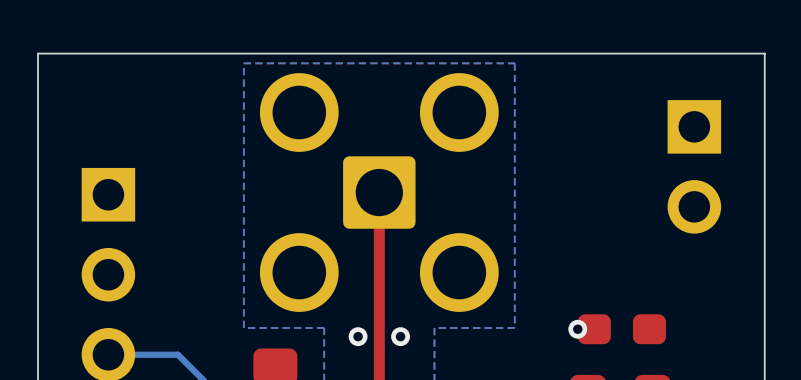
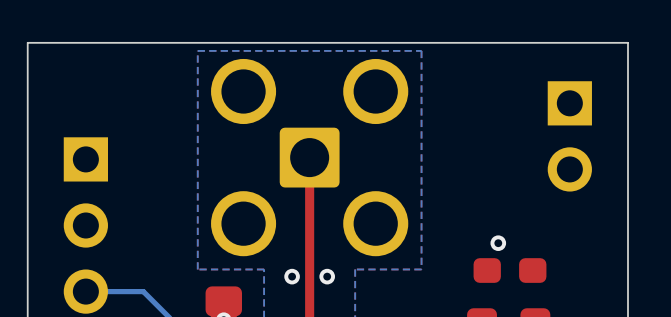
via position: (577, 329) -> (498, 243)

